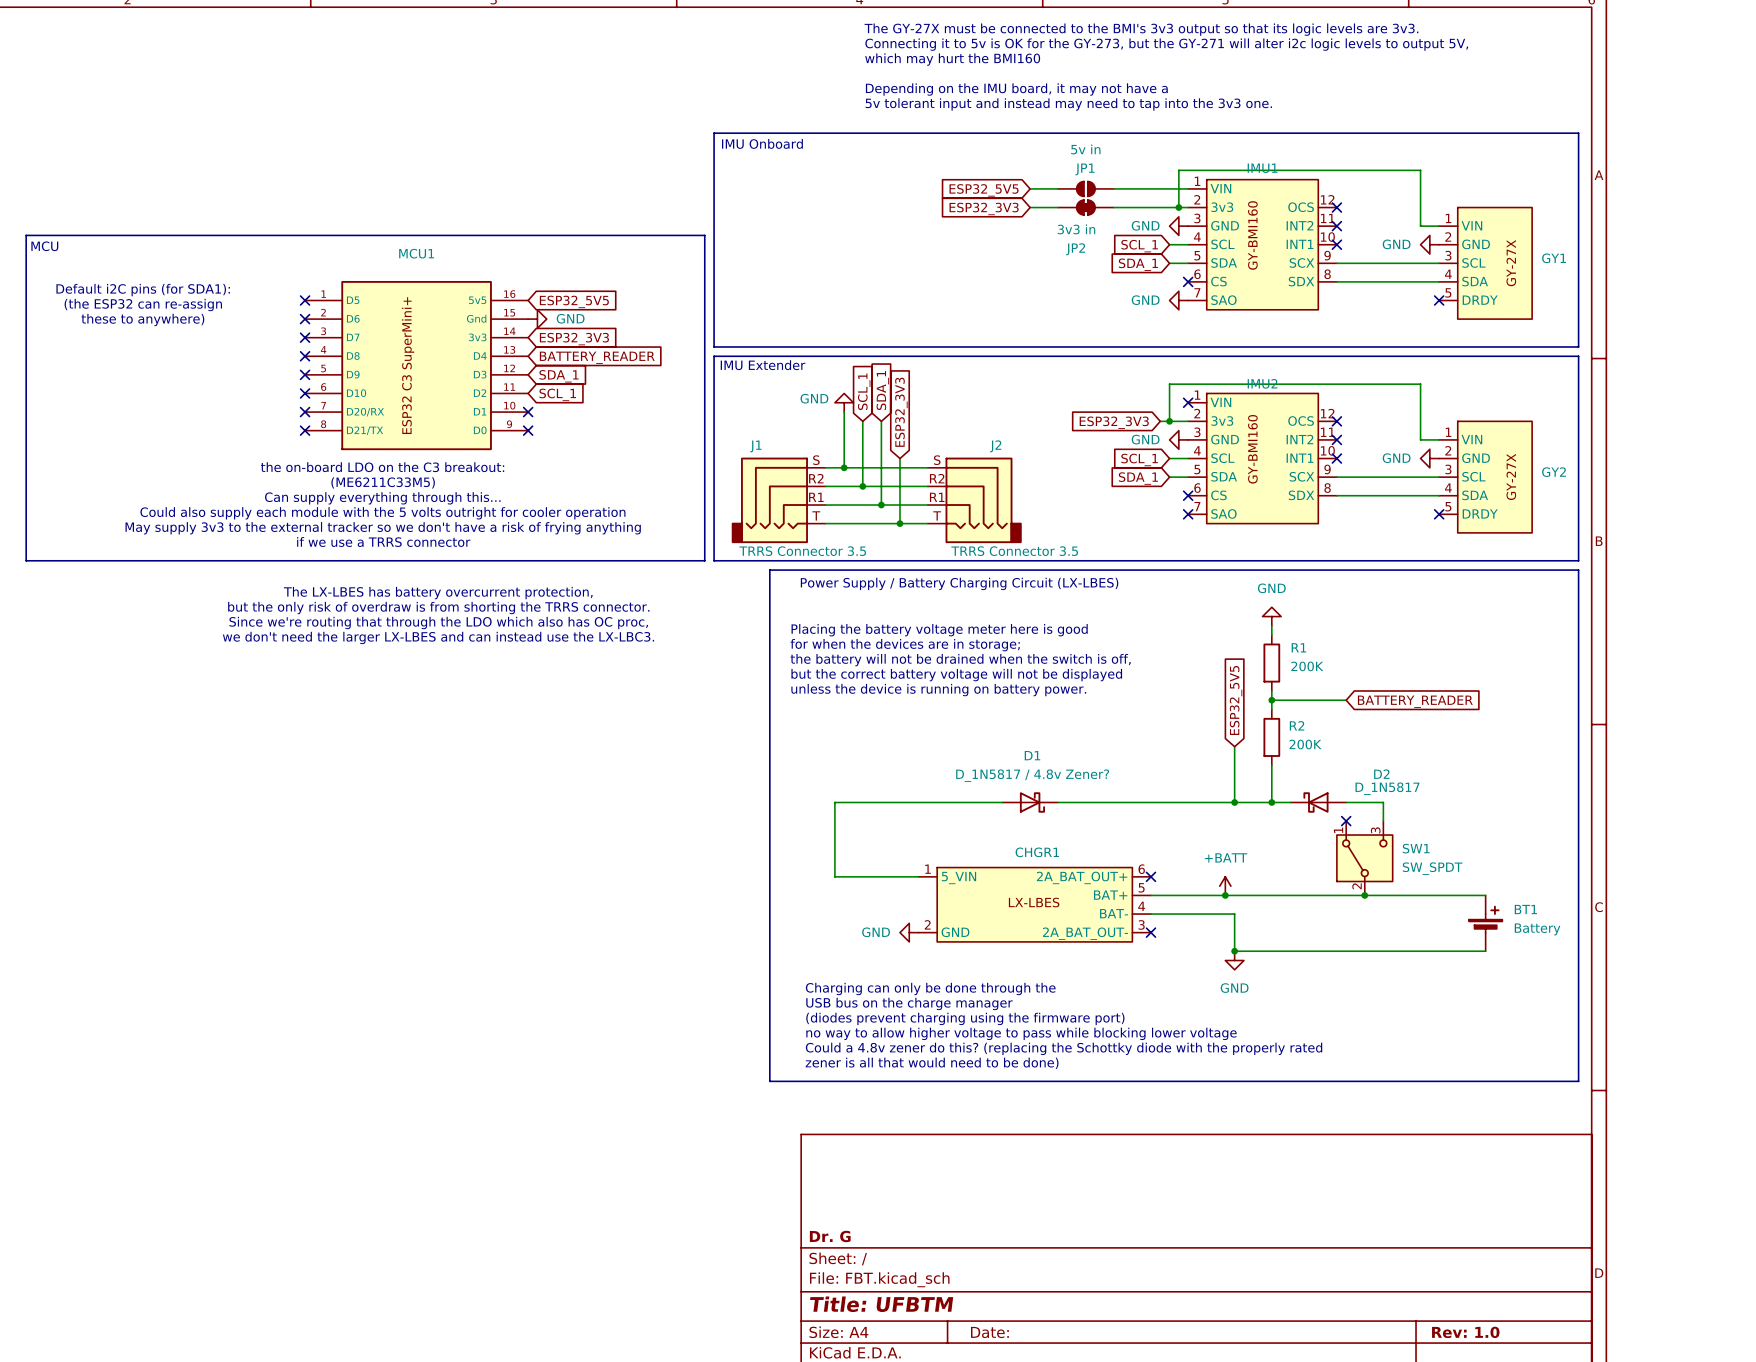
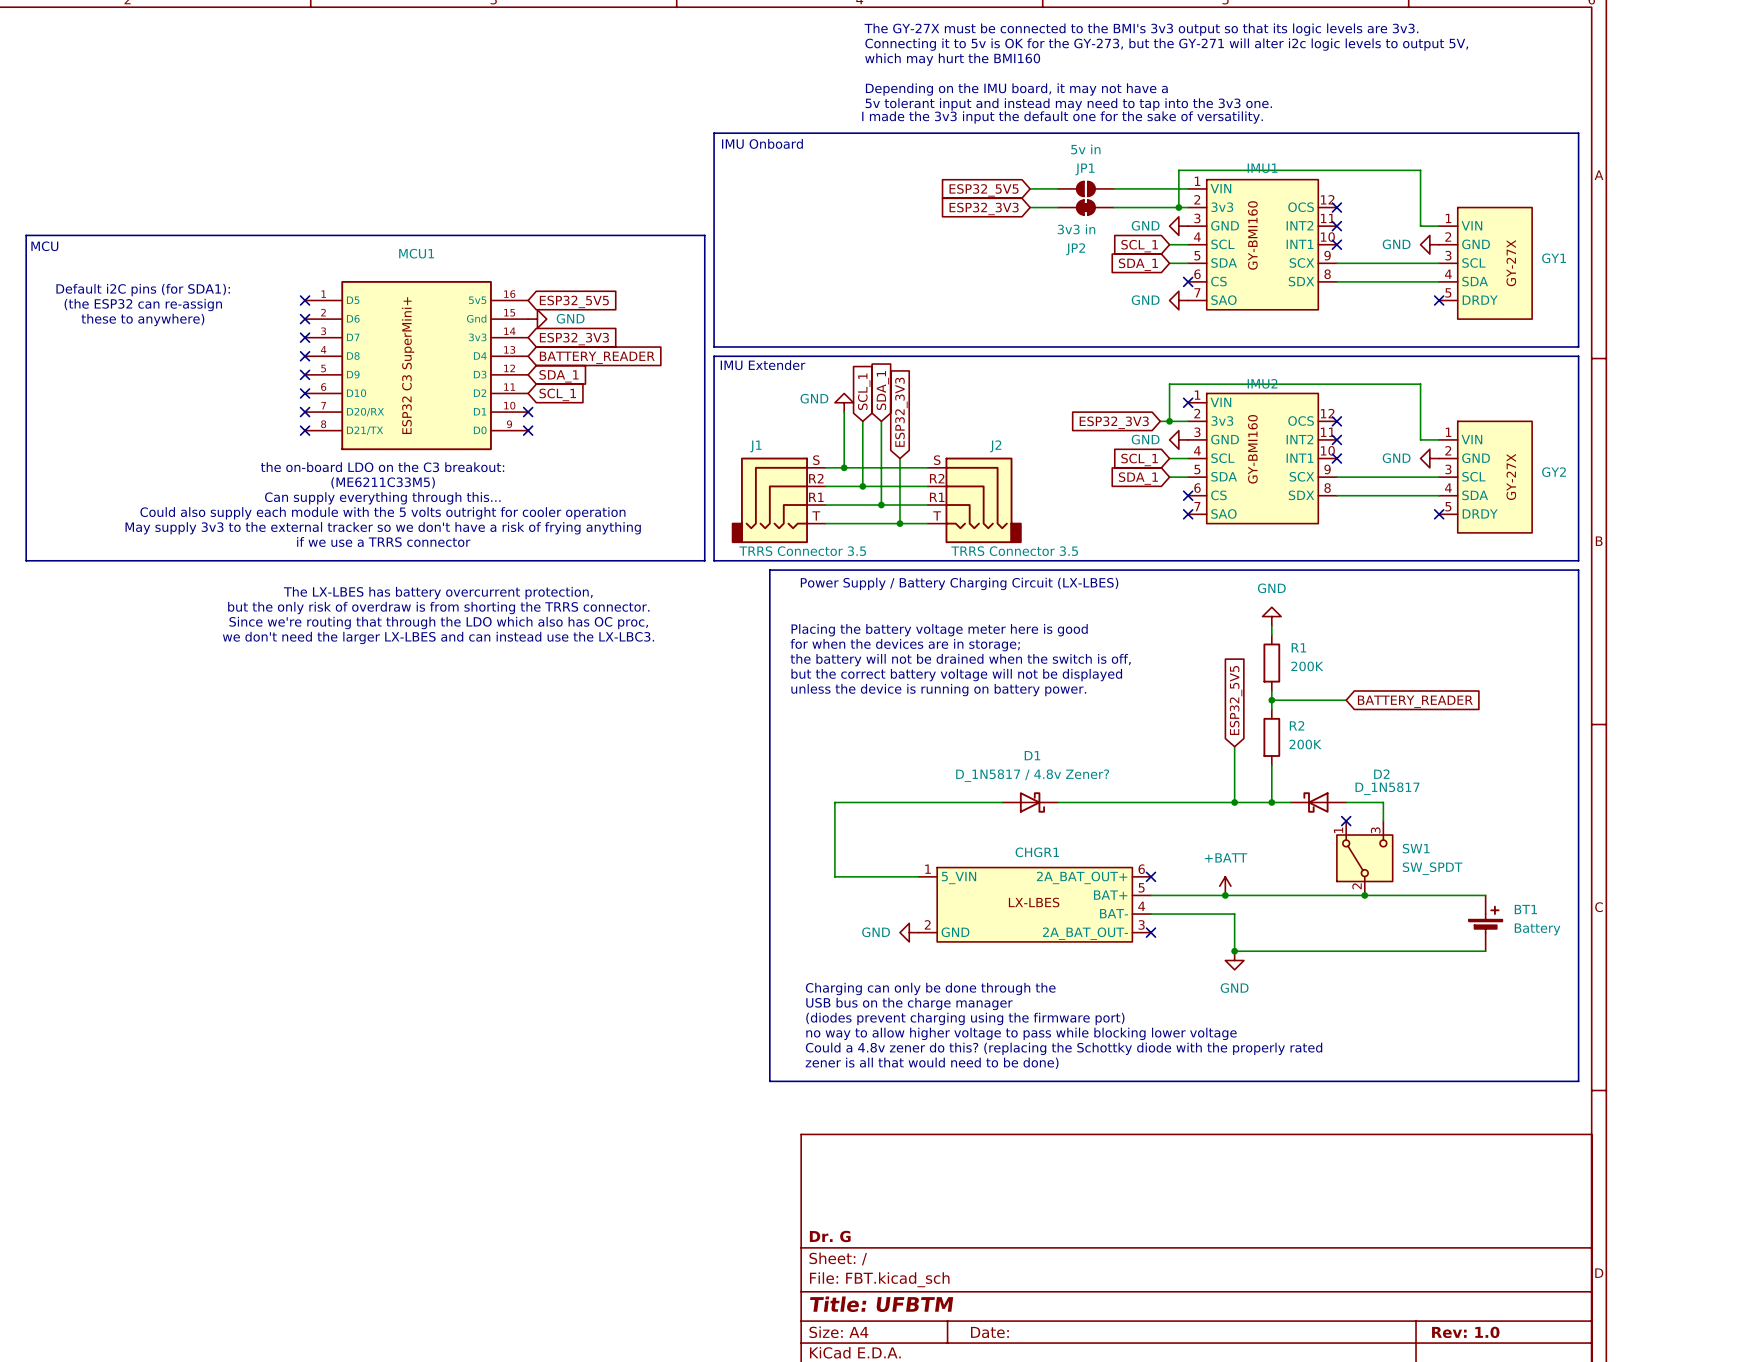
text: none -> I made the 3v3 input the default one for the sake of versatility. (1062, 117)

